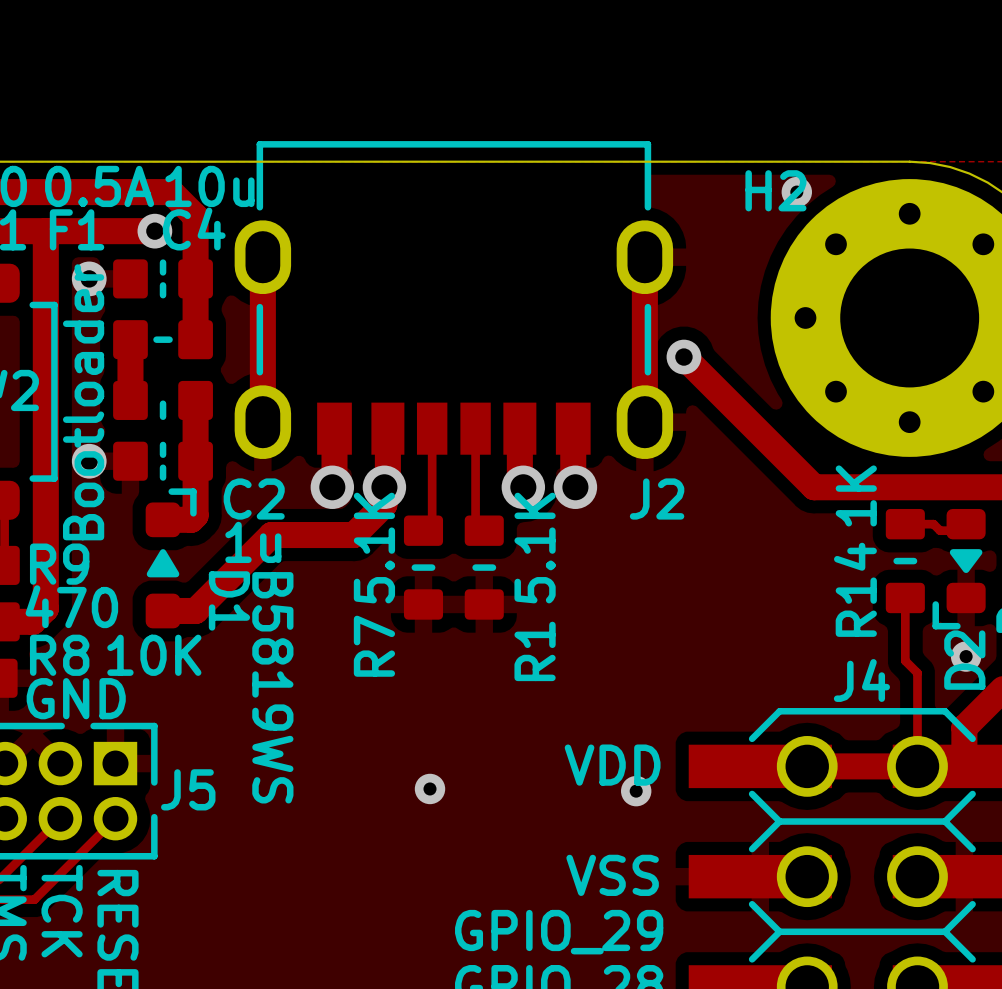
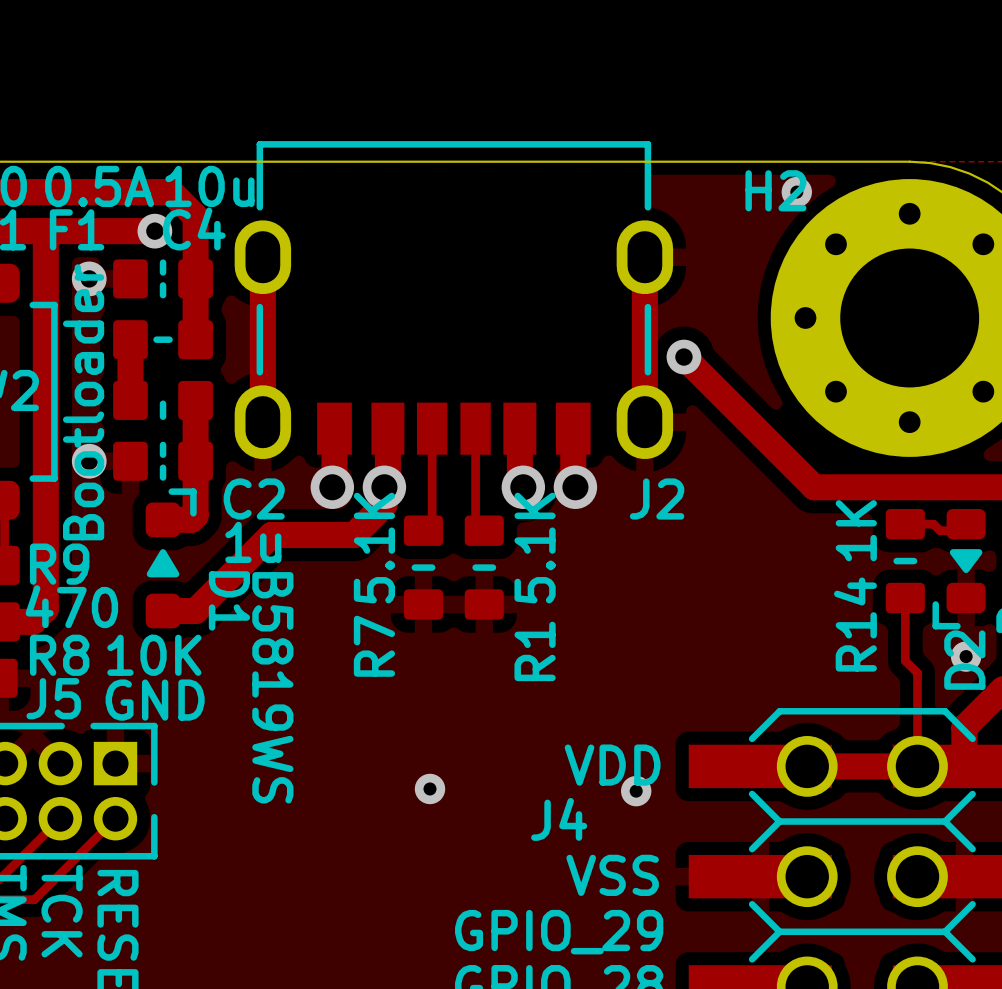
R14 value position: 1K (856, 495) -> 1K (856, 530)
R14 name position: R14 (855, 589) -> R14 (855, 624)
J4 name position: J4 (861, 680) -> J4 (559, 819)
text position: GND (76, 698) -> GND (155, 700)
J5 name position: J5 (188, 789) -> J5 (53, 698)

